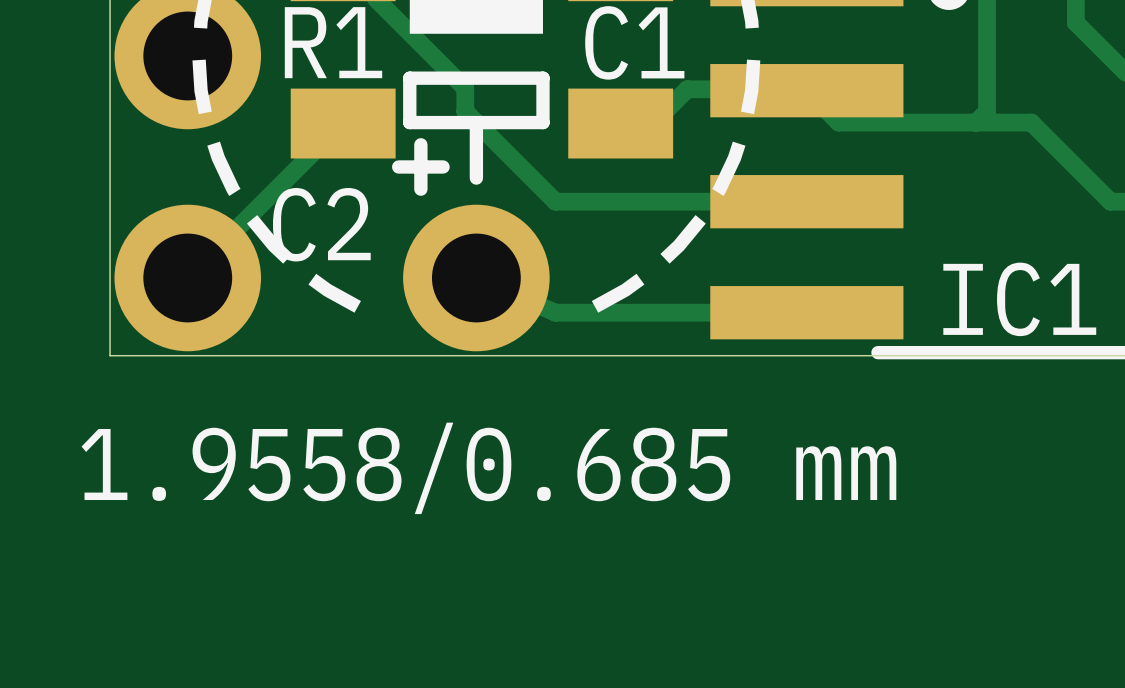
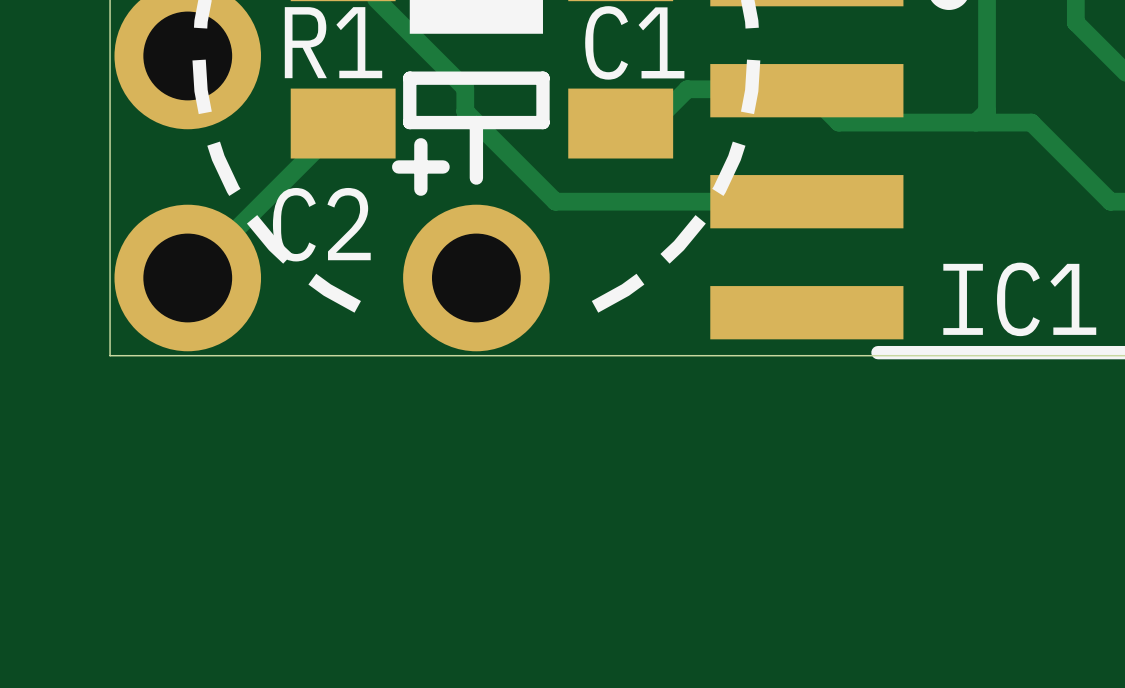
track: (476, 277) (555, 312) (806, 312) -> none
text: 1.9558/0.685 mm (488, 468) -> none

